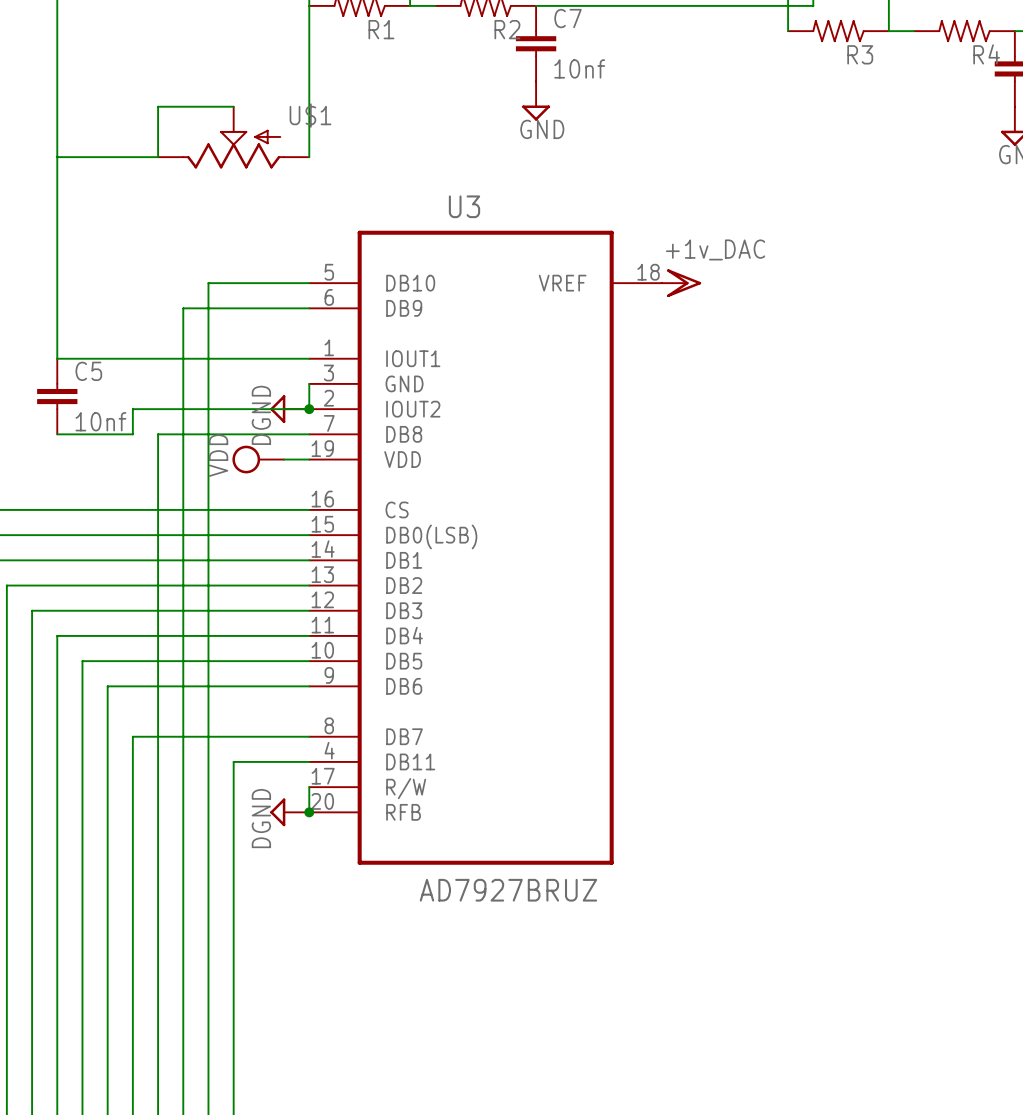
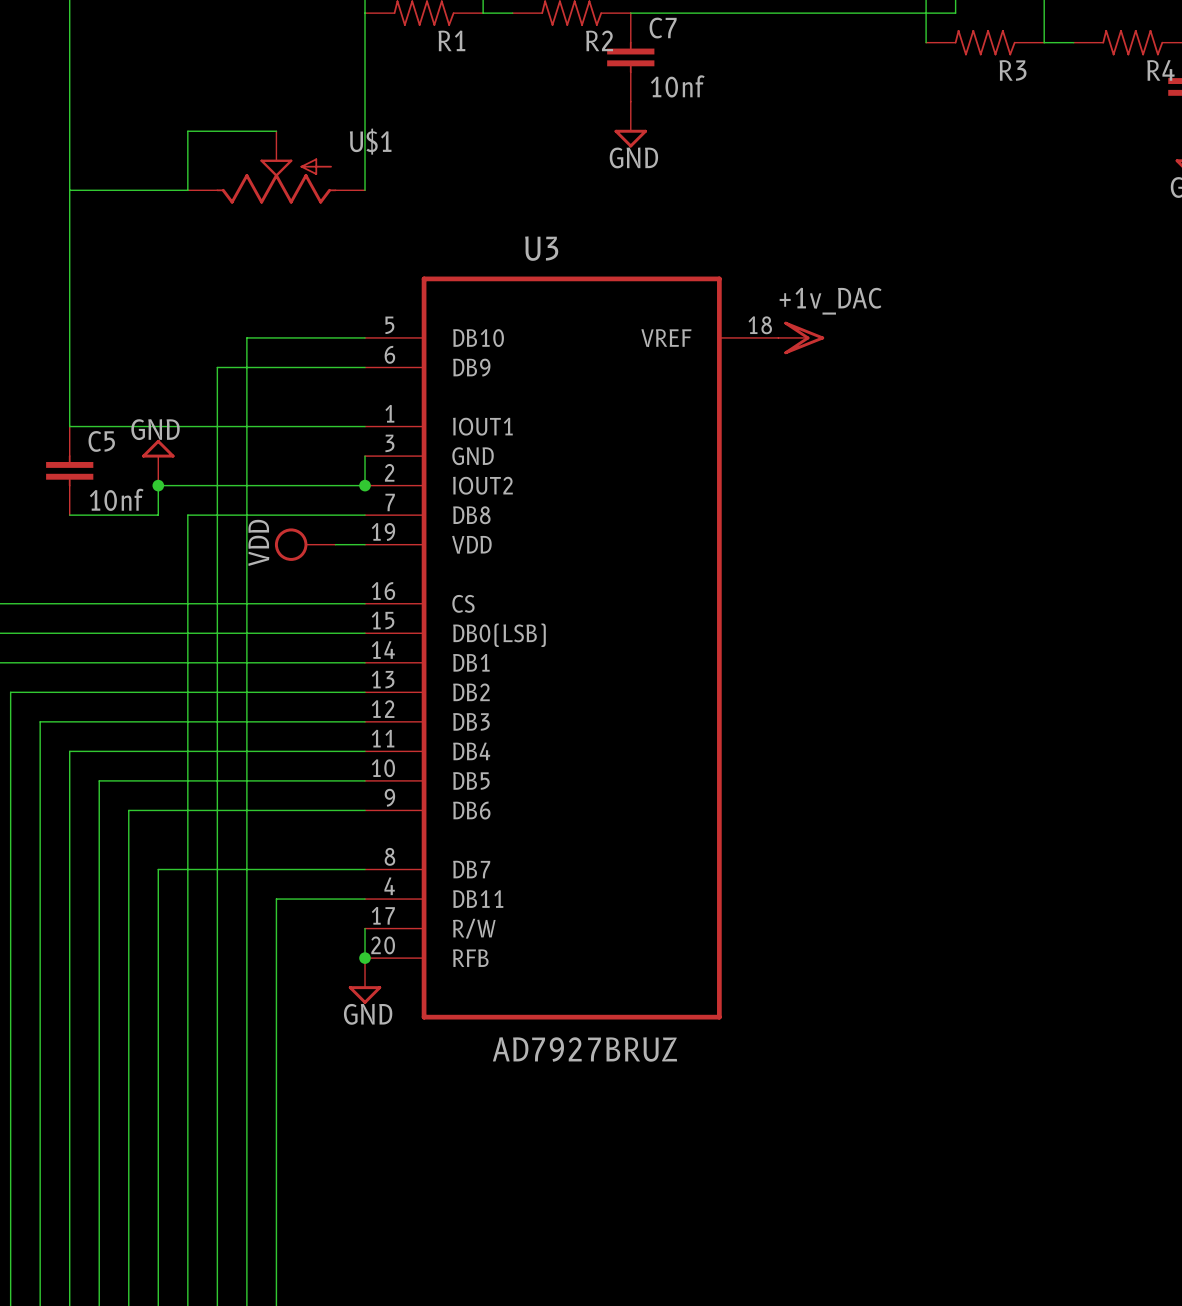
power symbol: none -> GND (158, 462)
junction: none -> (158, 485)
power symbol: DGND (289, 409) -> none
power symbol: DGND (289, 812) -> none
power symbol: none -> GND (365, 980)

